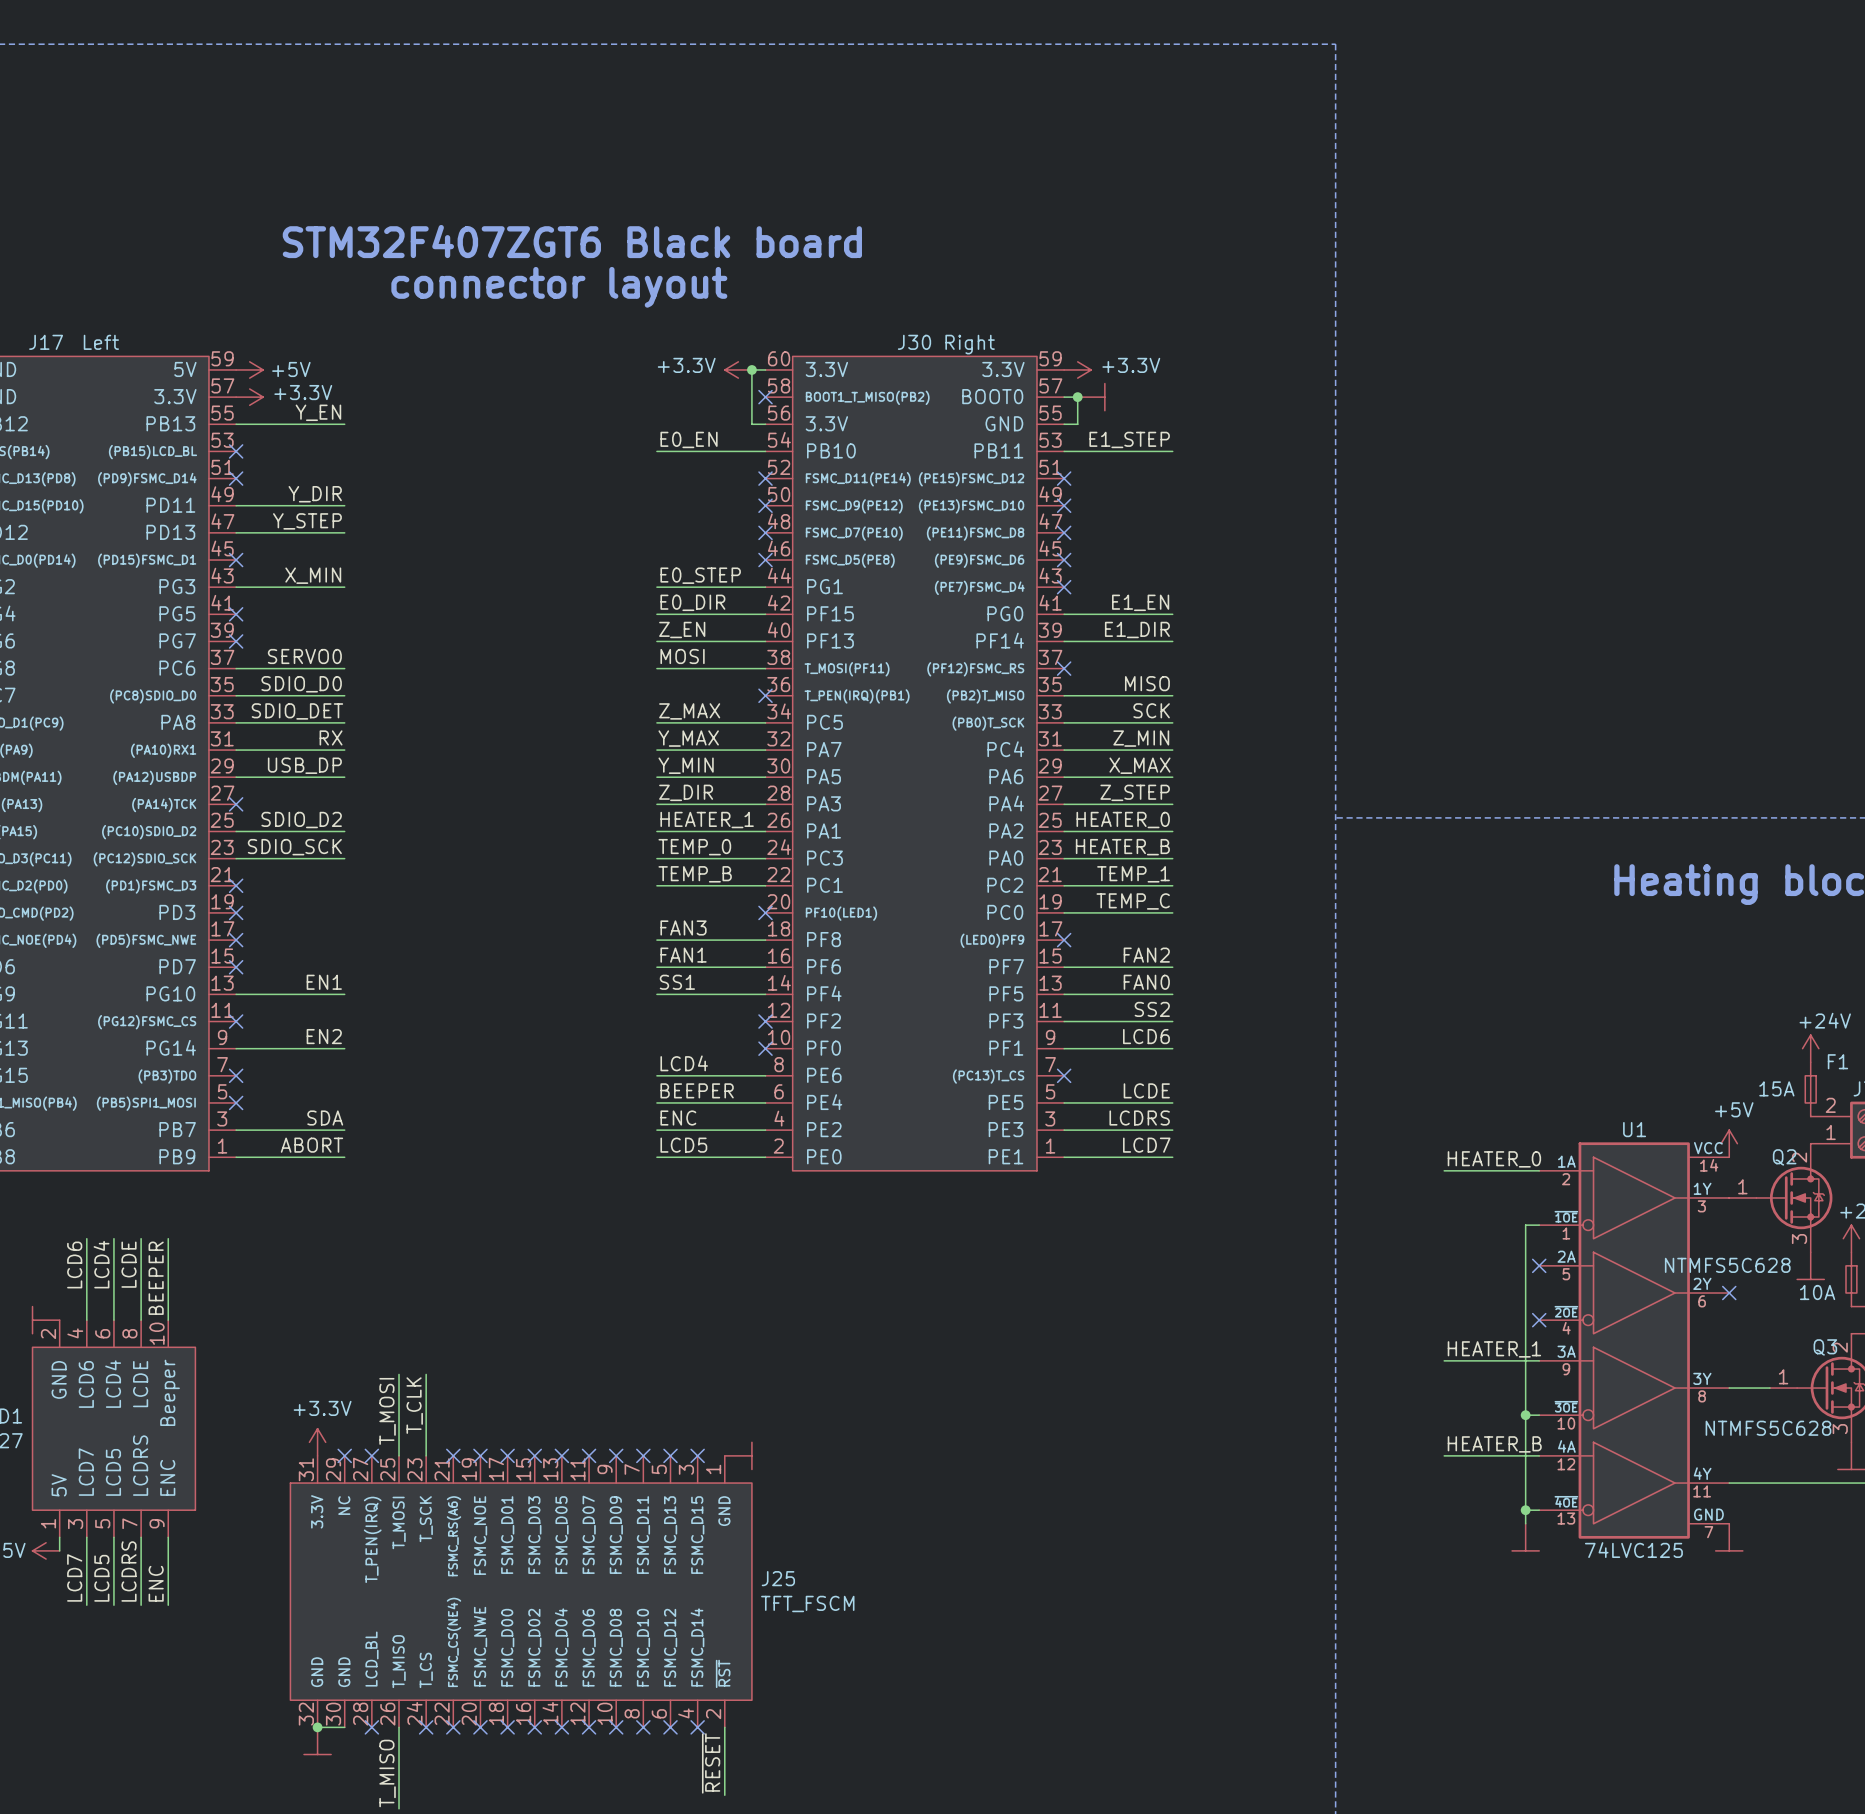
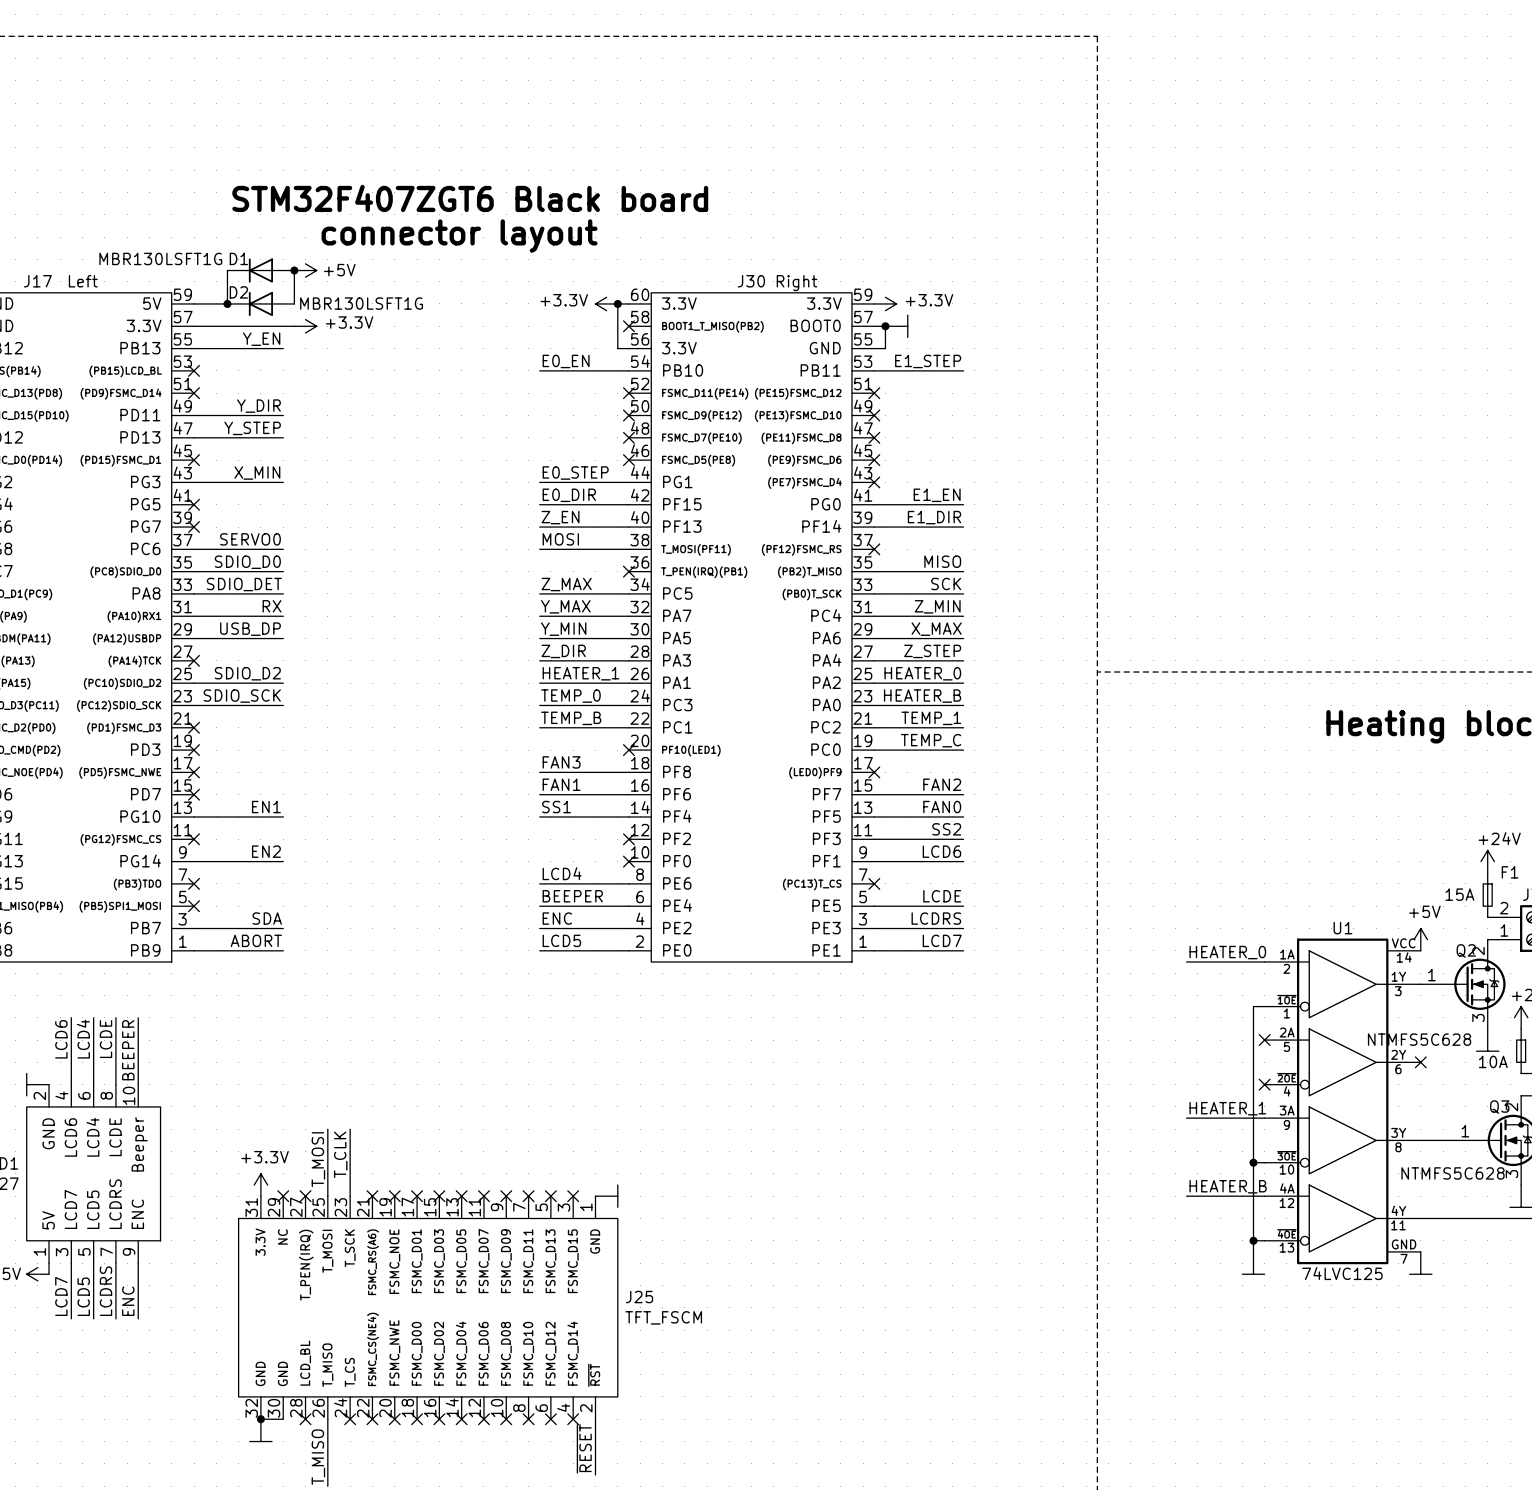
wire: none -> (227, 270) (227, 303) (194, 303)
D1: none -> MBR130LSFT1G (260, 270)
wire: none -> (294, 270) (294, 303)
junction: none -> (294, 270)
power symbol position: +5V (249, 369) -> +5V (305, 270)
junction: none -> (227, 303)
D2: none -> MBR130LSFT1G (260, 303)
wire: none -> (194, 326) (294, 326)
power symbol position: +3.3V (249, 397) -> +3.3V (305, 326)

